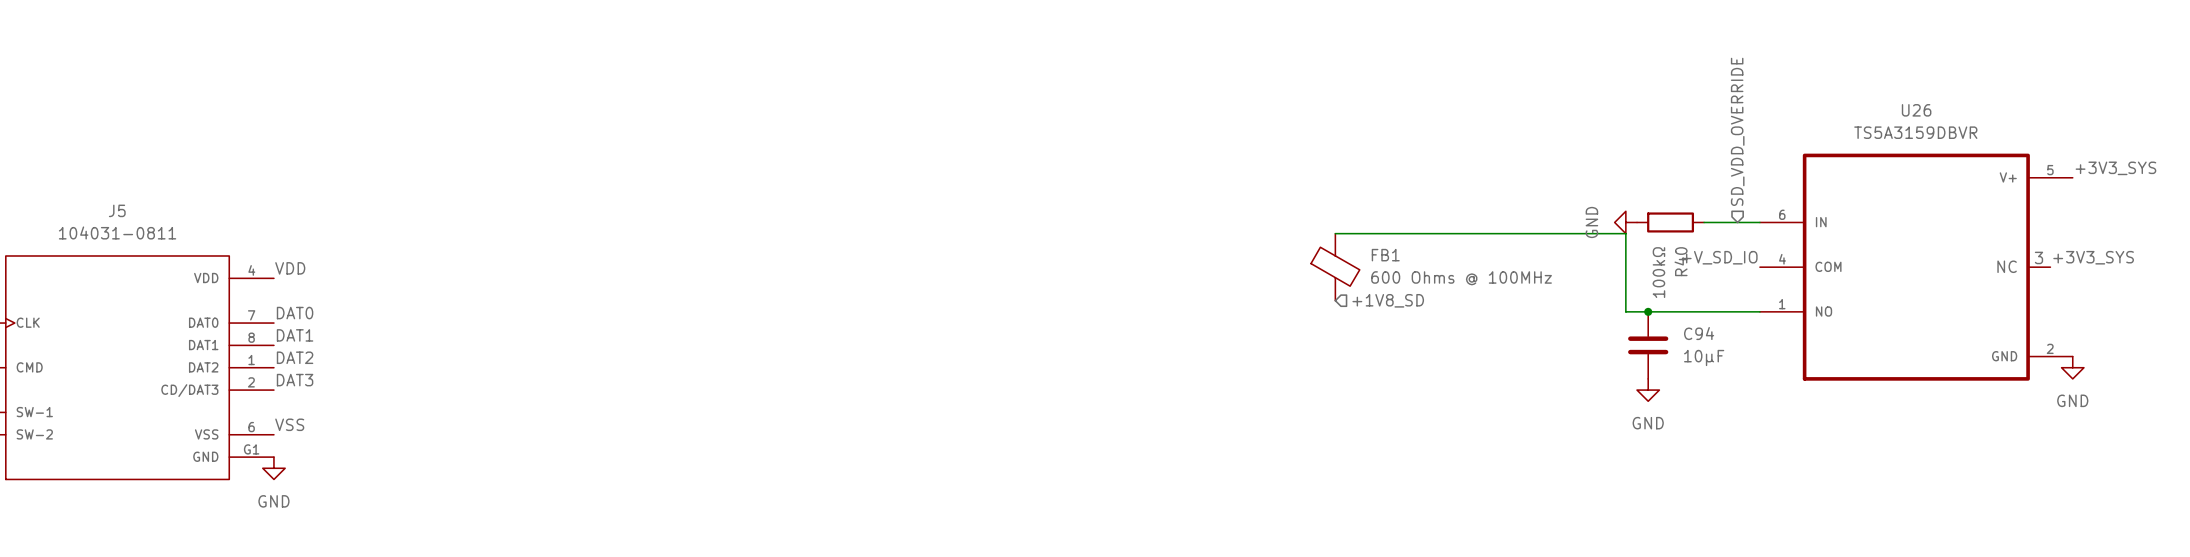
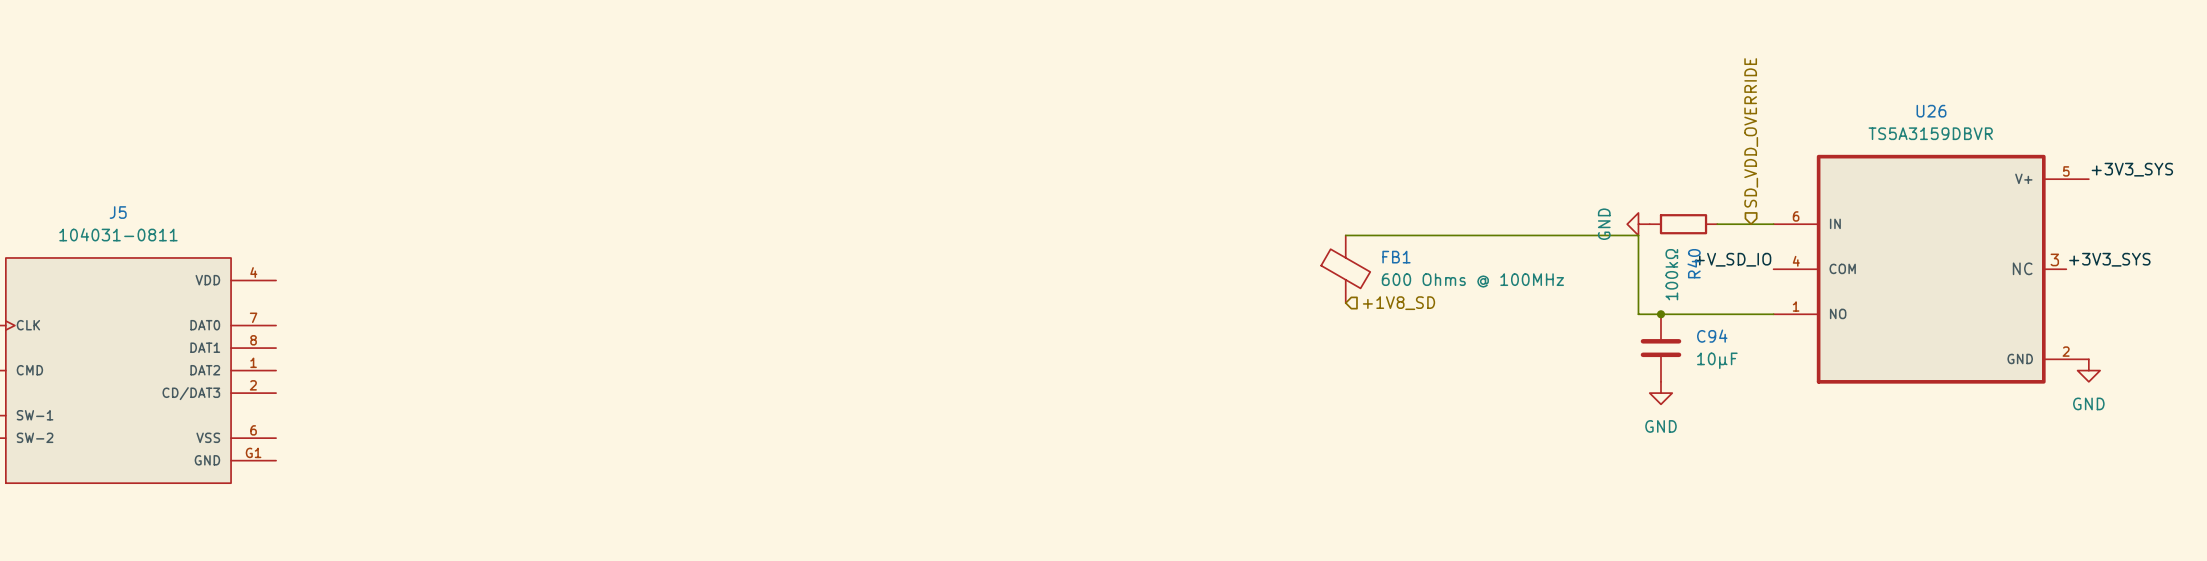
label: VDD (290, 268) -> none
label: DAT0 (295, 313) -> none
label: DAT1 (295, 335) -> none
label: DAT2 (295, 357) -> none
label: DAT3 (295, 380) -> none
label: VSS (289, 424) -> none
power symbol: GND (273, 468) -> none

